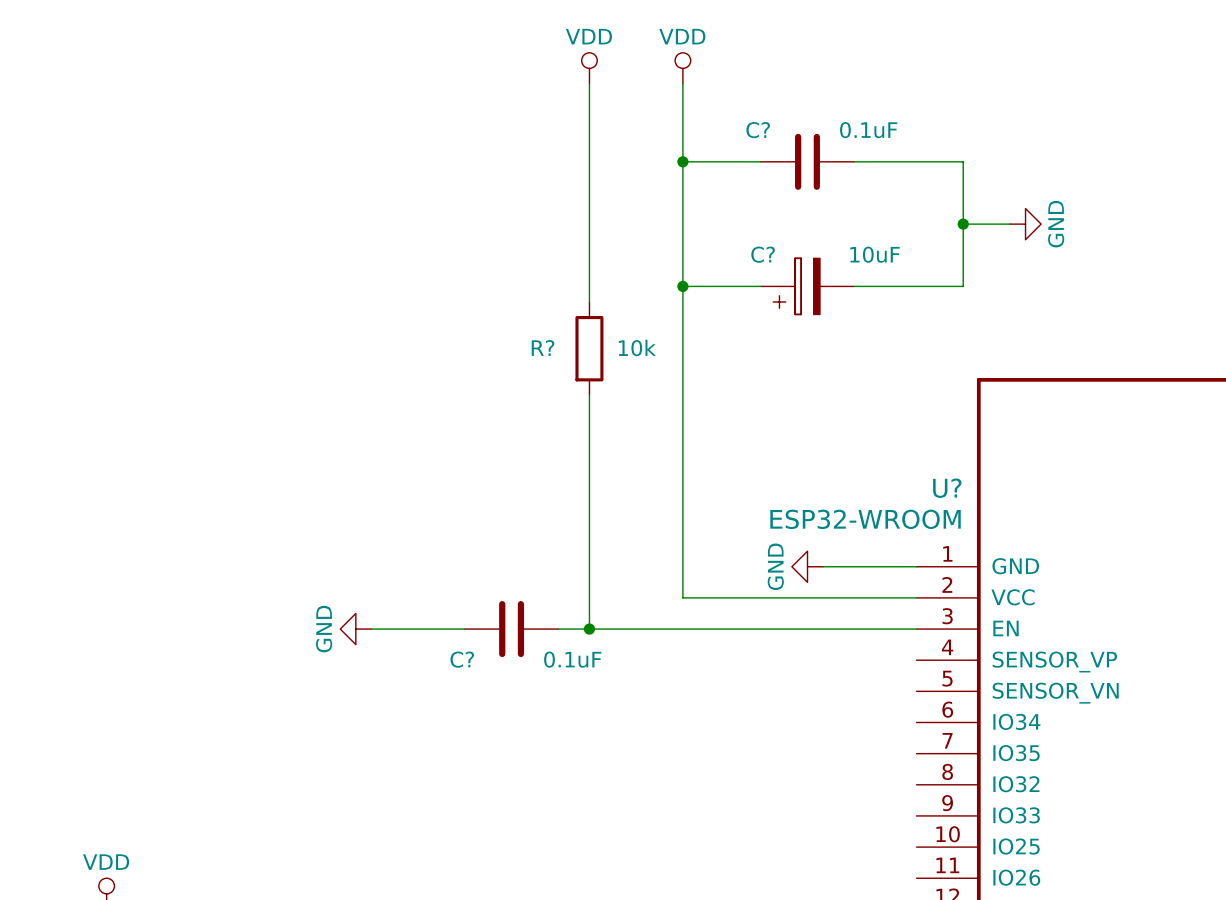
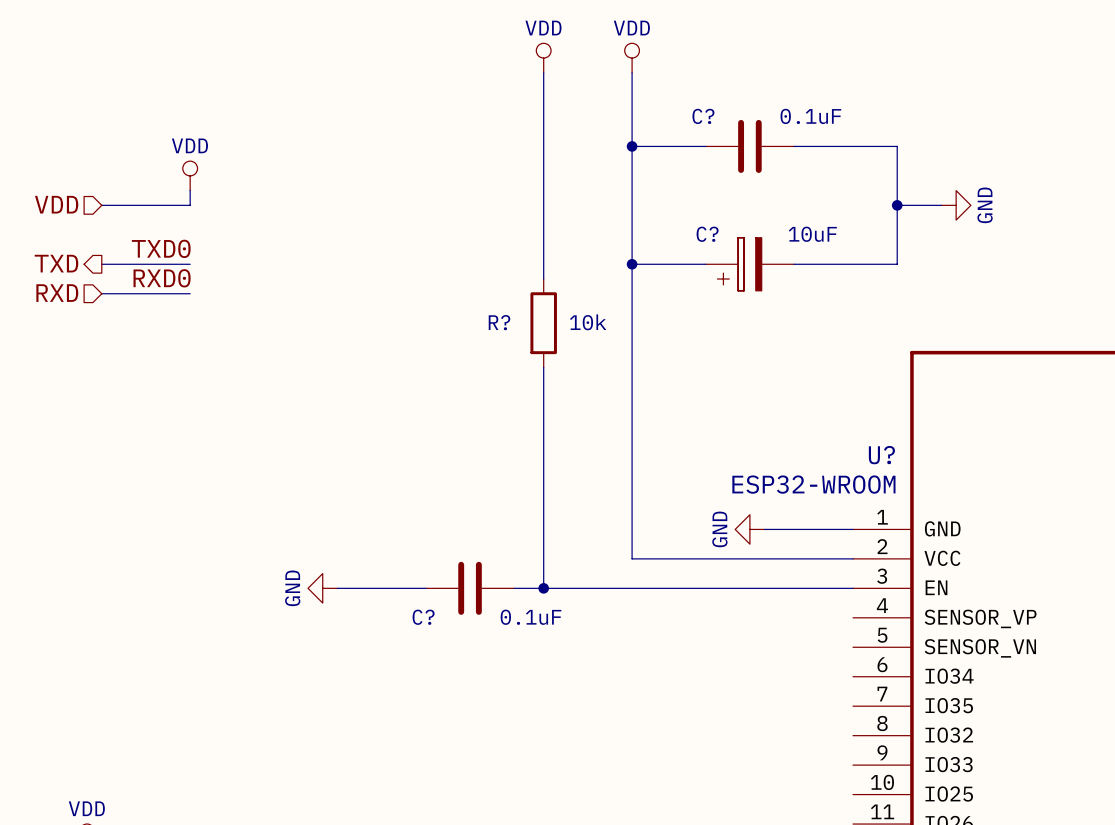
power symbol: none -> VDD (190, 175)
wire: none -> (190, 190) (190, 205) (101, 205)
hierarchical label: none -> VDD (56, 204)
label: none -> TXD0 (161, 248)
hierarchical label: none -> TXD (56, 263)
wire: none -> (101, 264) (190, 264)
label: none -> RXD0 (162, 278)
hierarchical label: none -> RXD (57, 293)
wire: none -> (101, 293) (190, 293)

